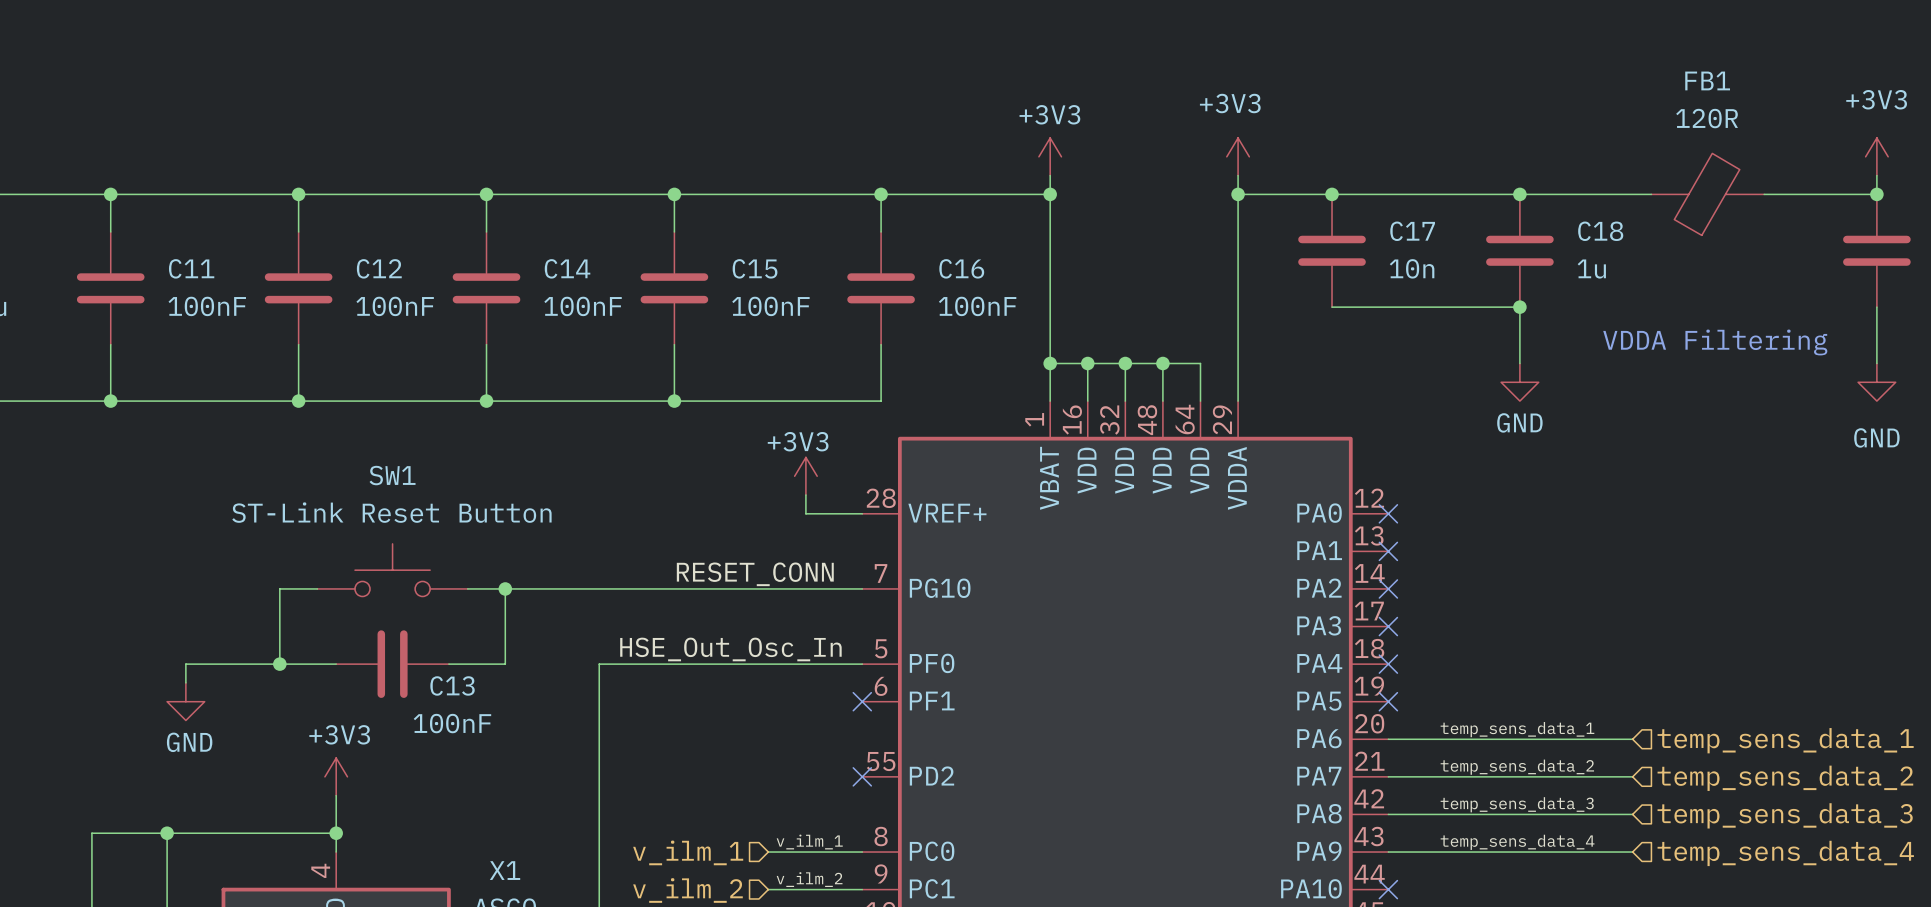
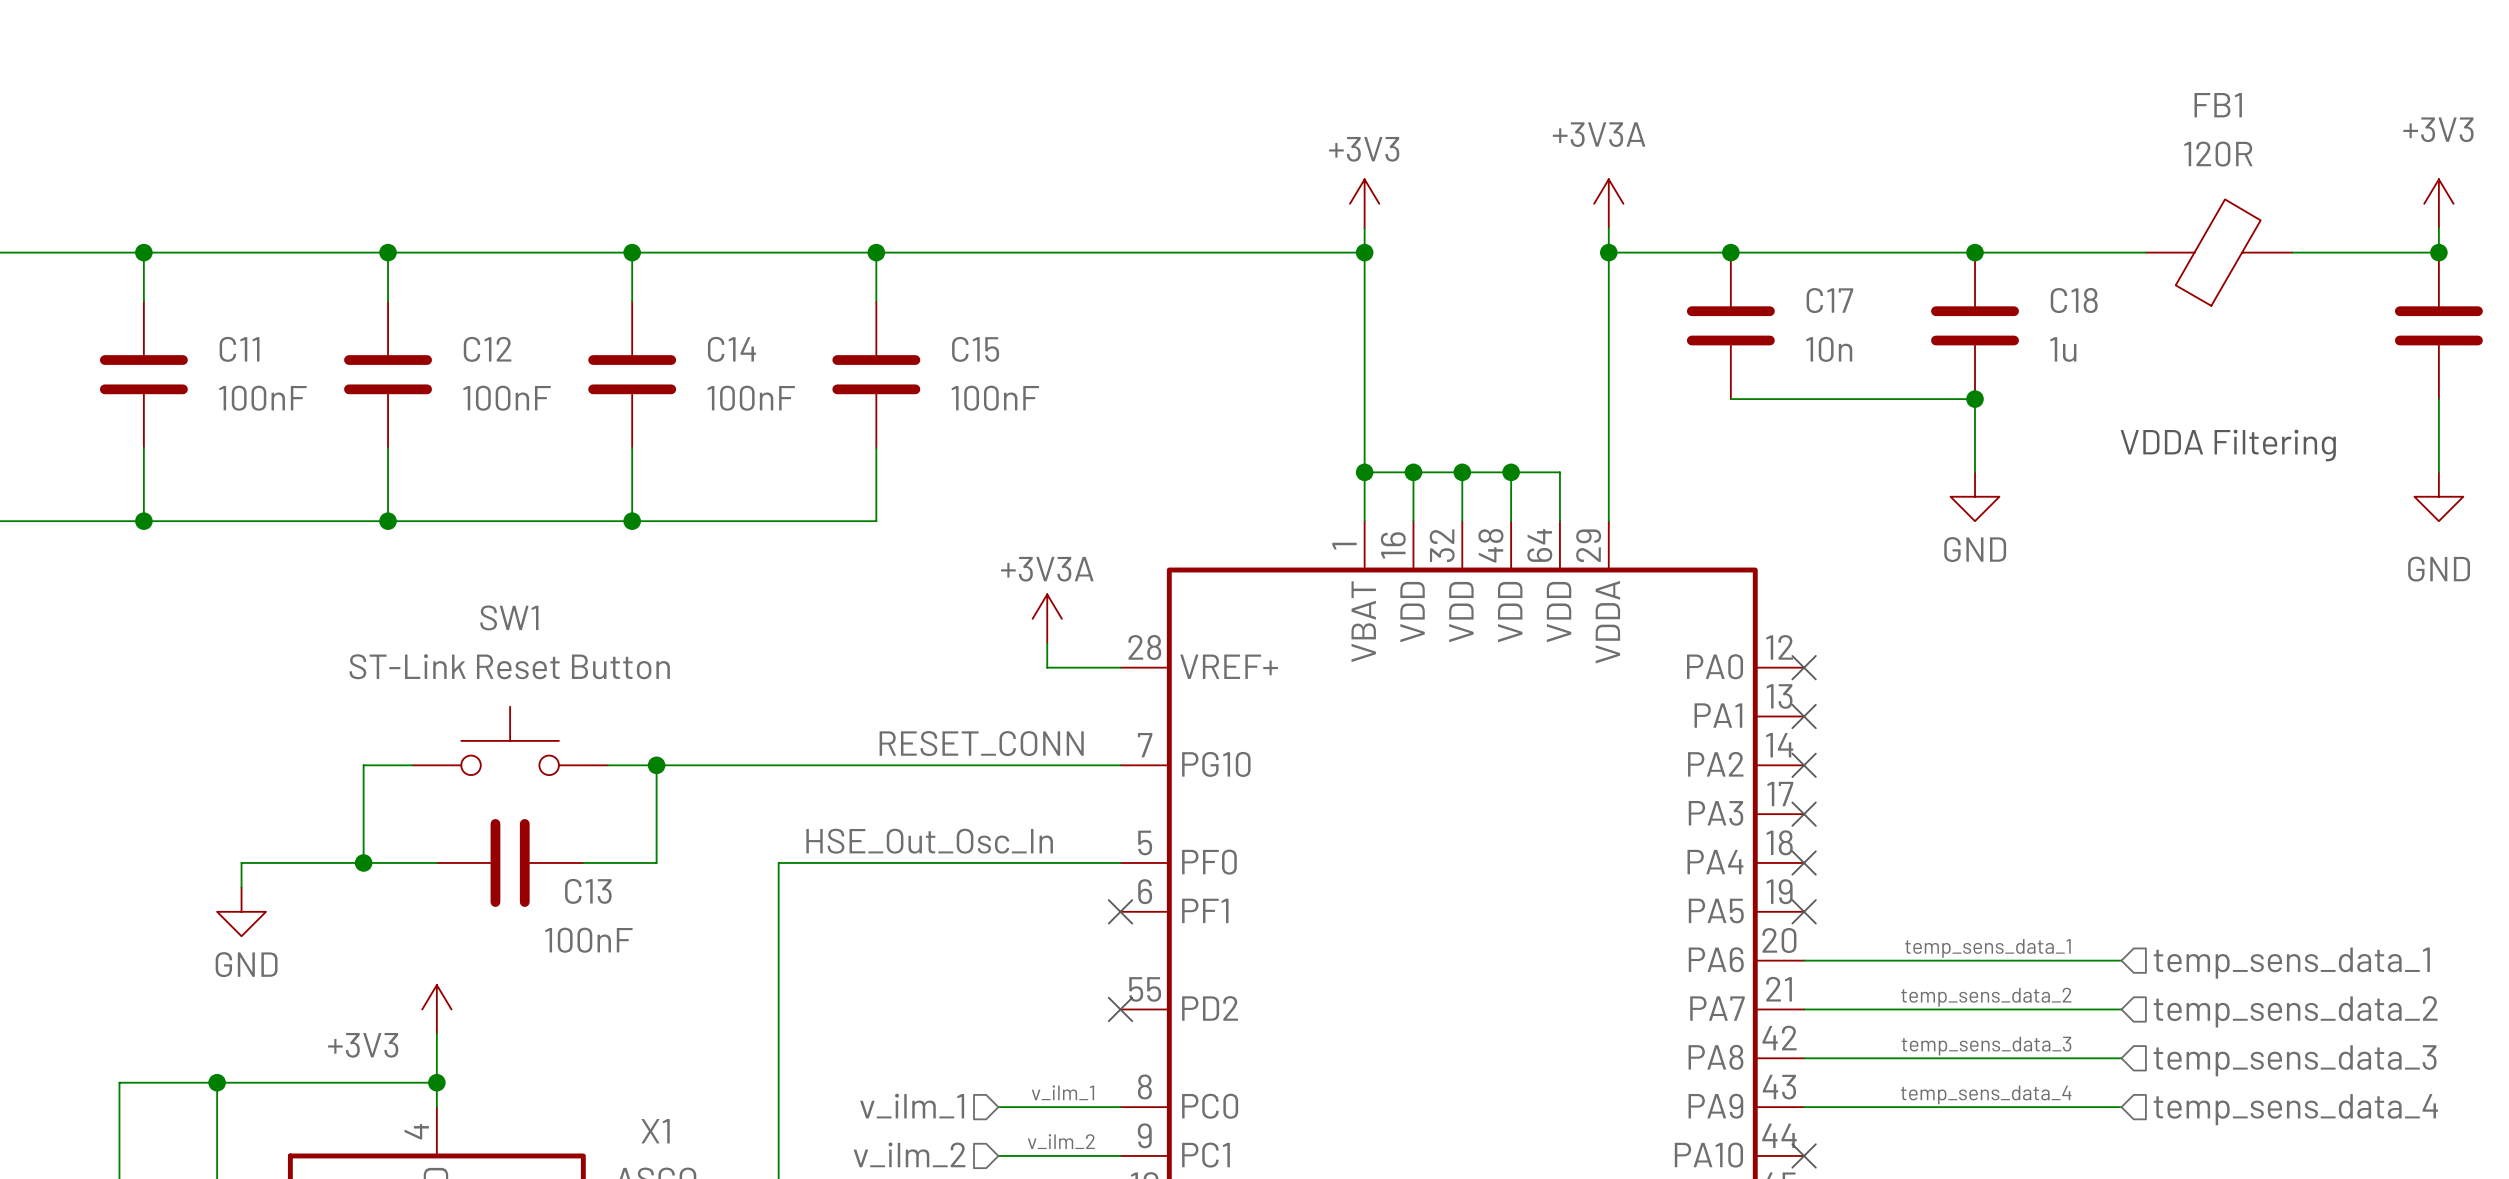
power symbol: +3V3 (1238, 156) -> +3V3A (1608, 203)
wire: (881, 194) (881, 231) -> none
junction: (881, 194) -> none
C16: 100nF (881, 288) -> none
wire: (881, 344) (881, 401) (674, 401) -> none
junction: (674, 401) -> none
power symbol: +3V3 (805, 476) -> +3V3A (1047, 618)
power symbol text position: +3V3 (339, 734) -> +3V3 (363, 1045)

